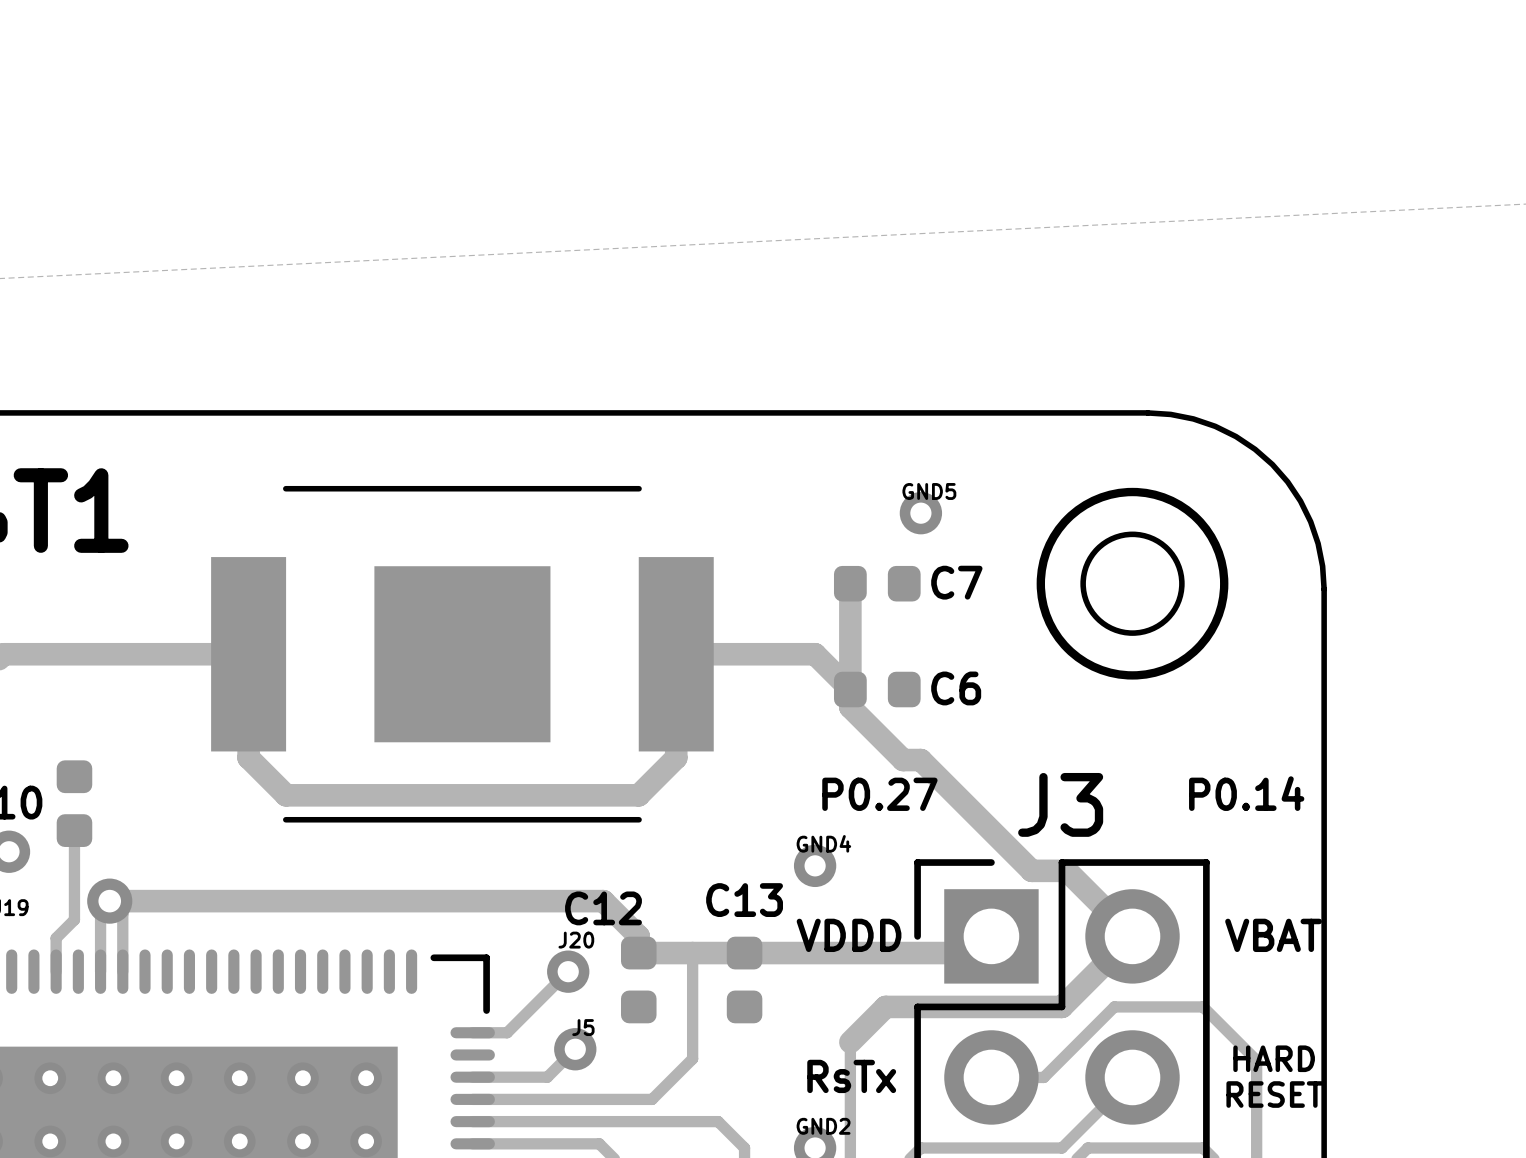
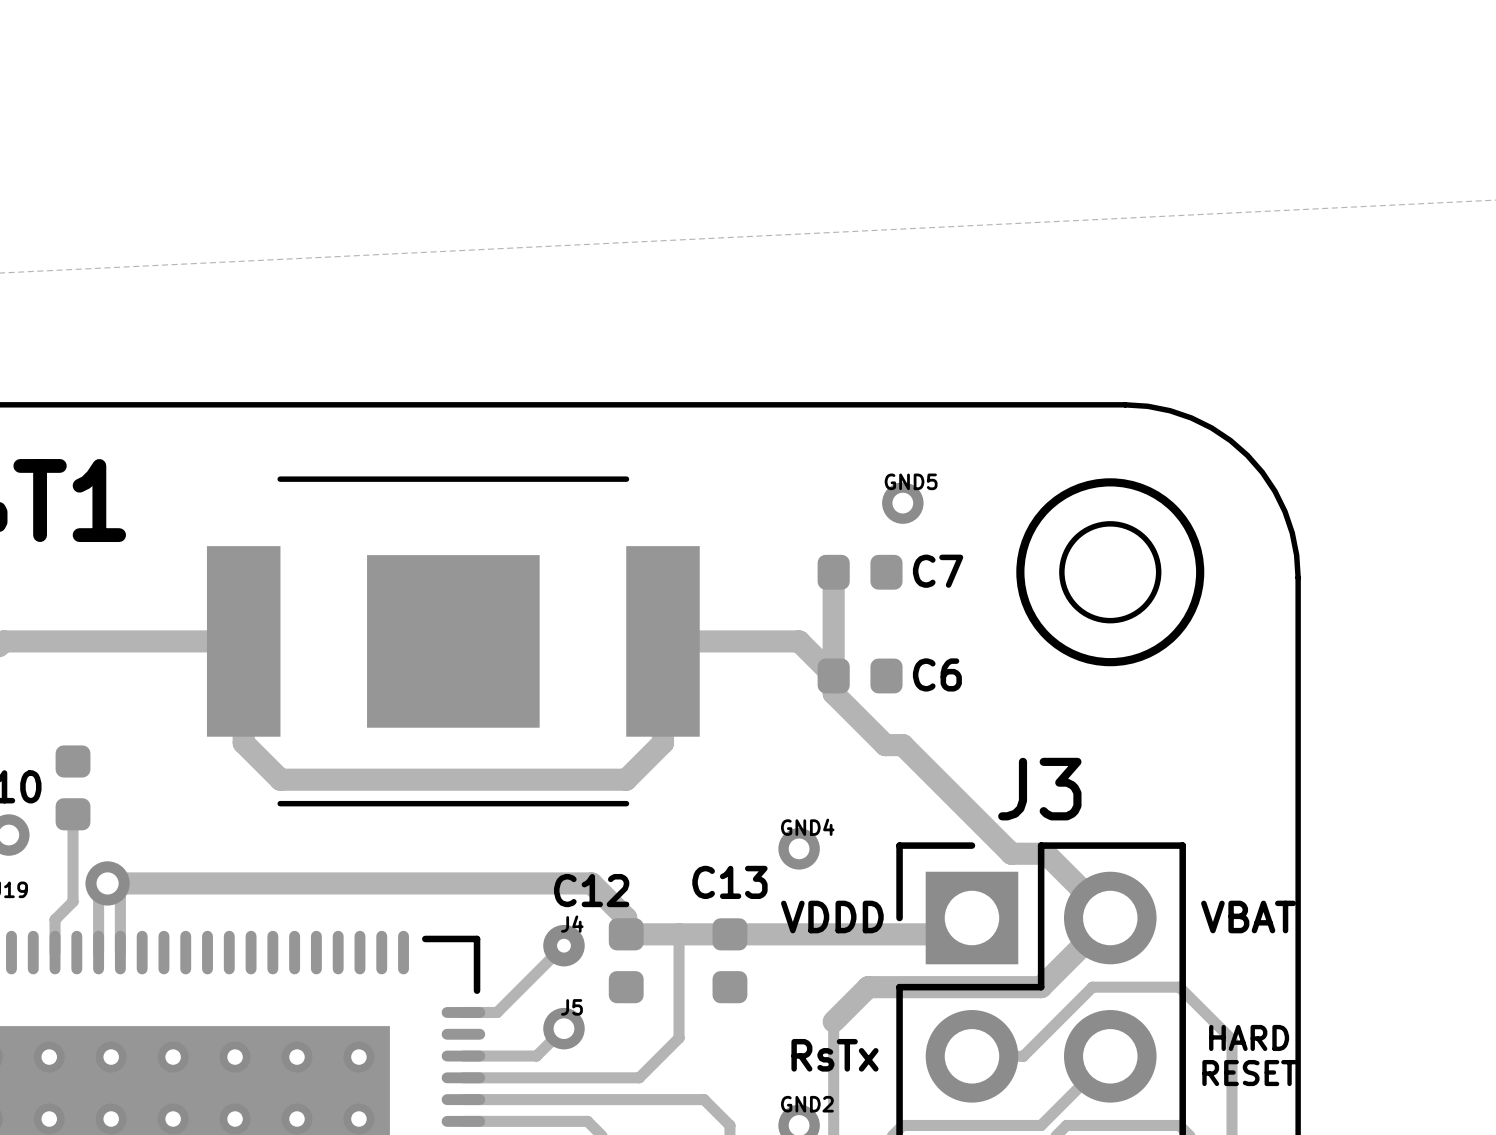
text: P0.14 (1246, 793) -> none
text: P0.27 (879, 794) -> none
J4: none -> (563, 945)
J20: (568, 971) -> none

